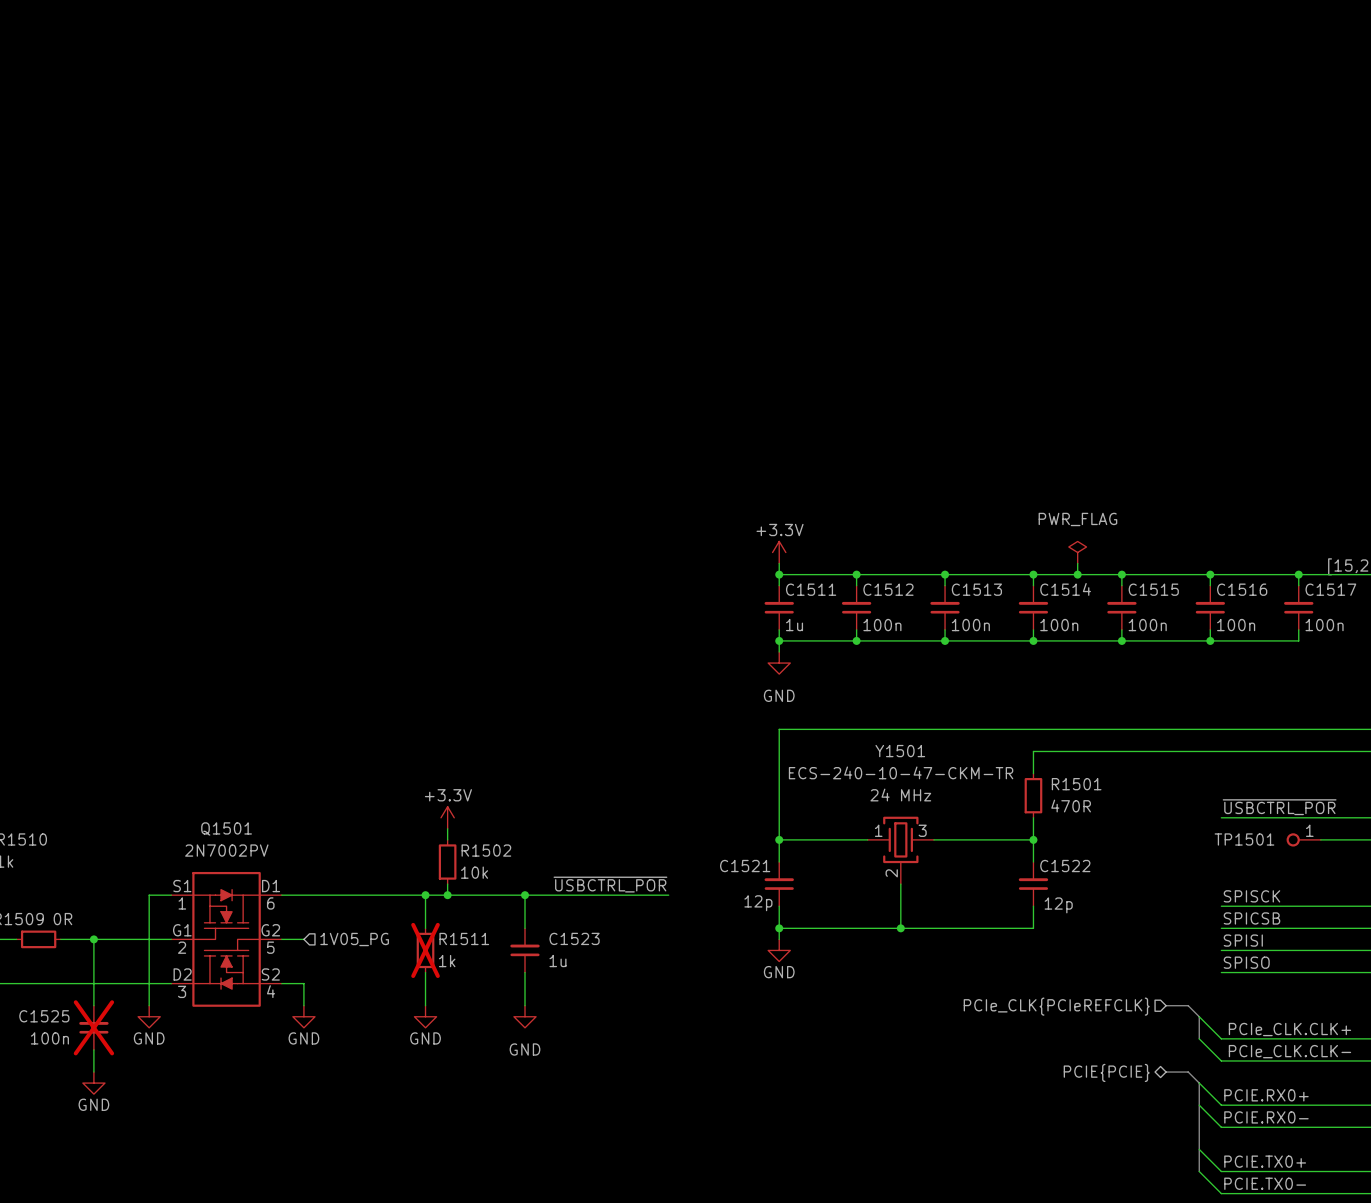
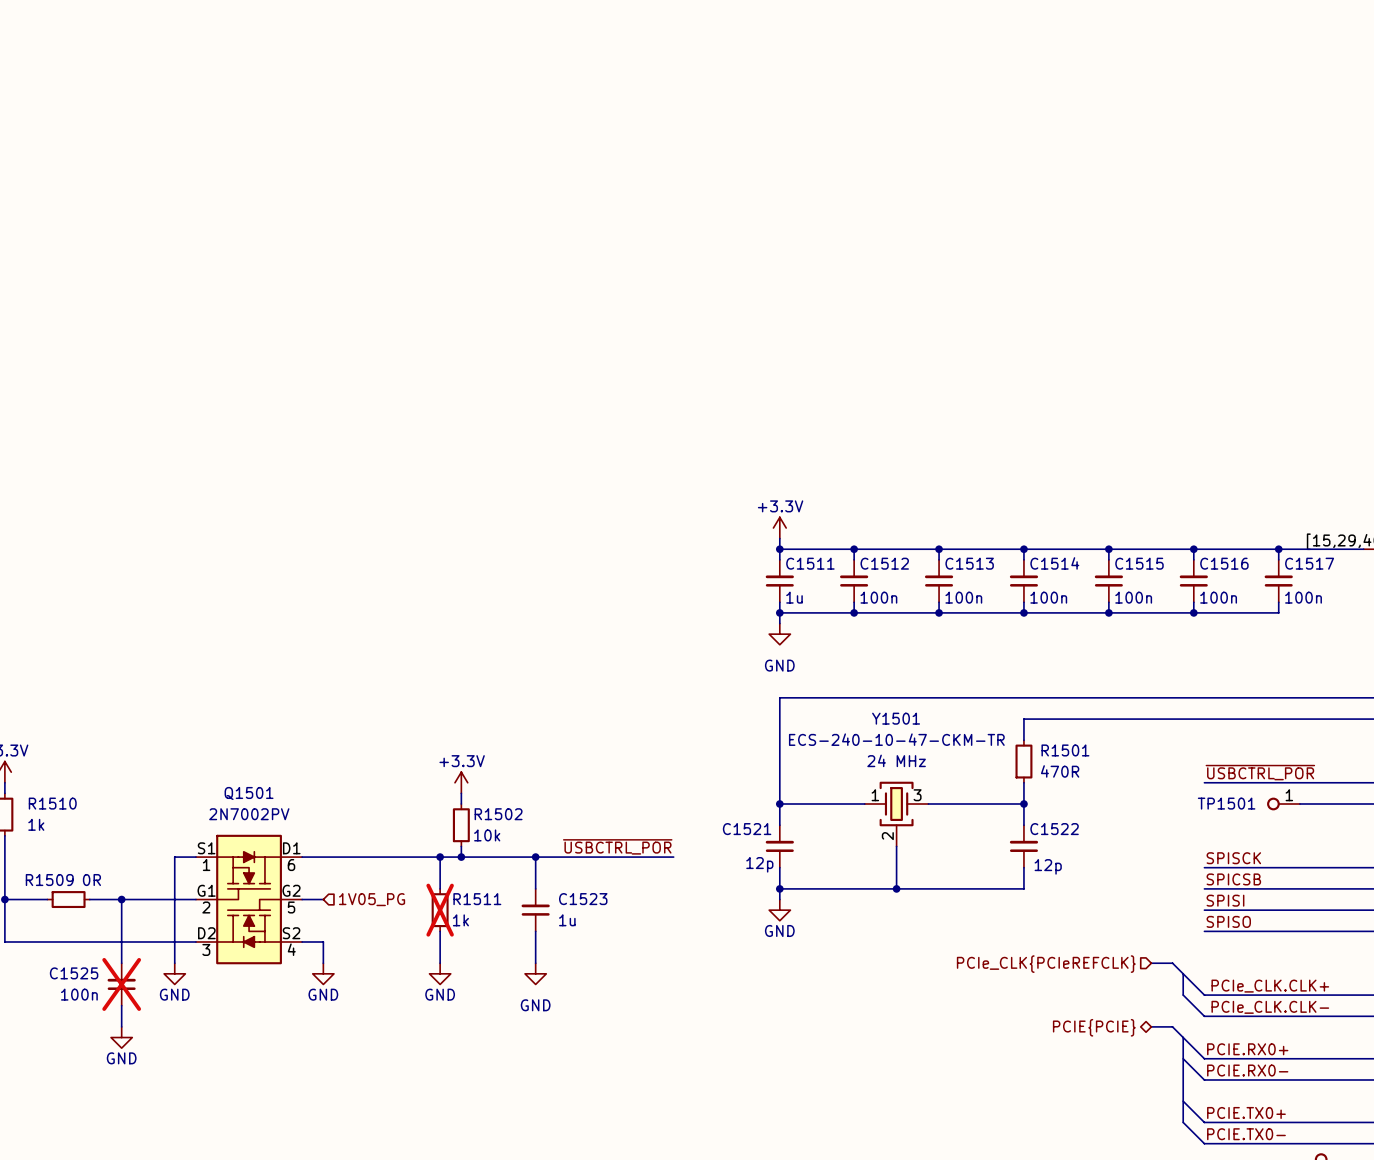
power symbol: PWR_FLAG (1077, 552) -> none
wire: (1077, 563) (1077, 574) -> none
junction: (1077, 574) -> none

